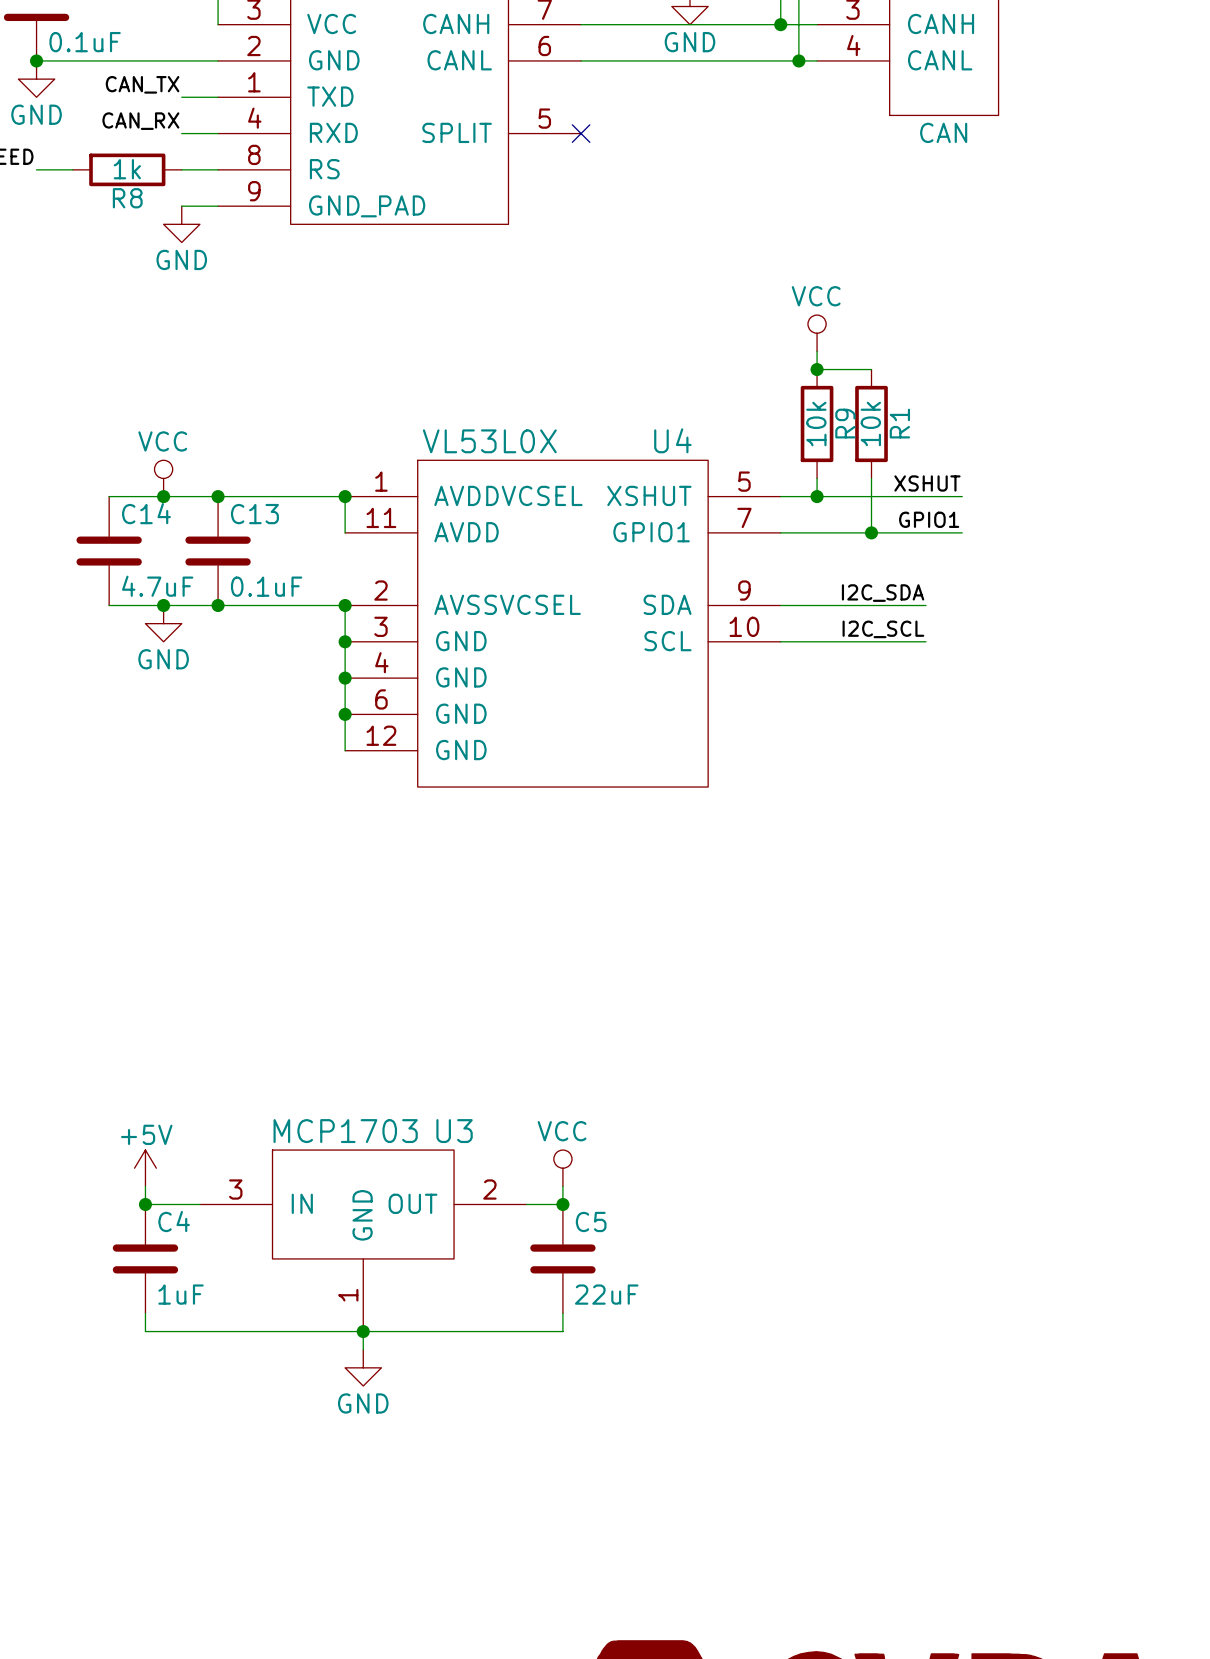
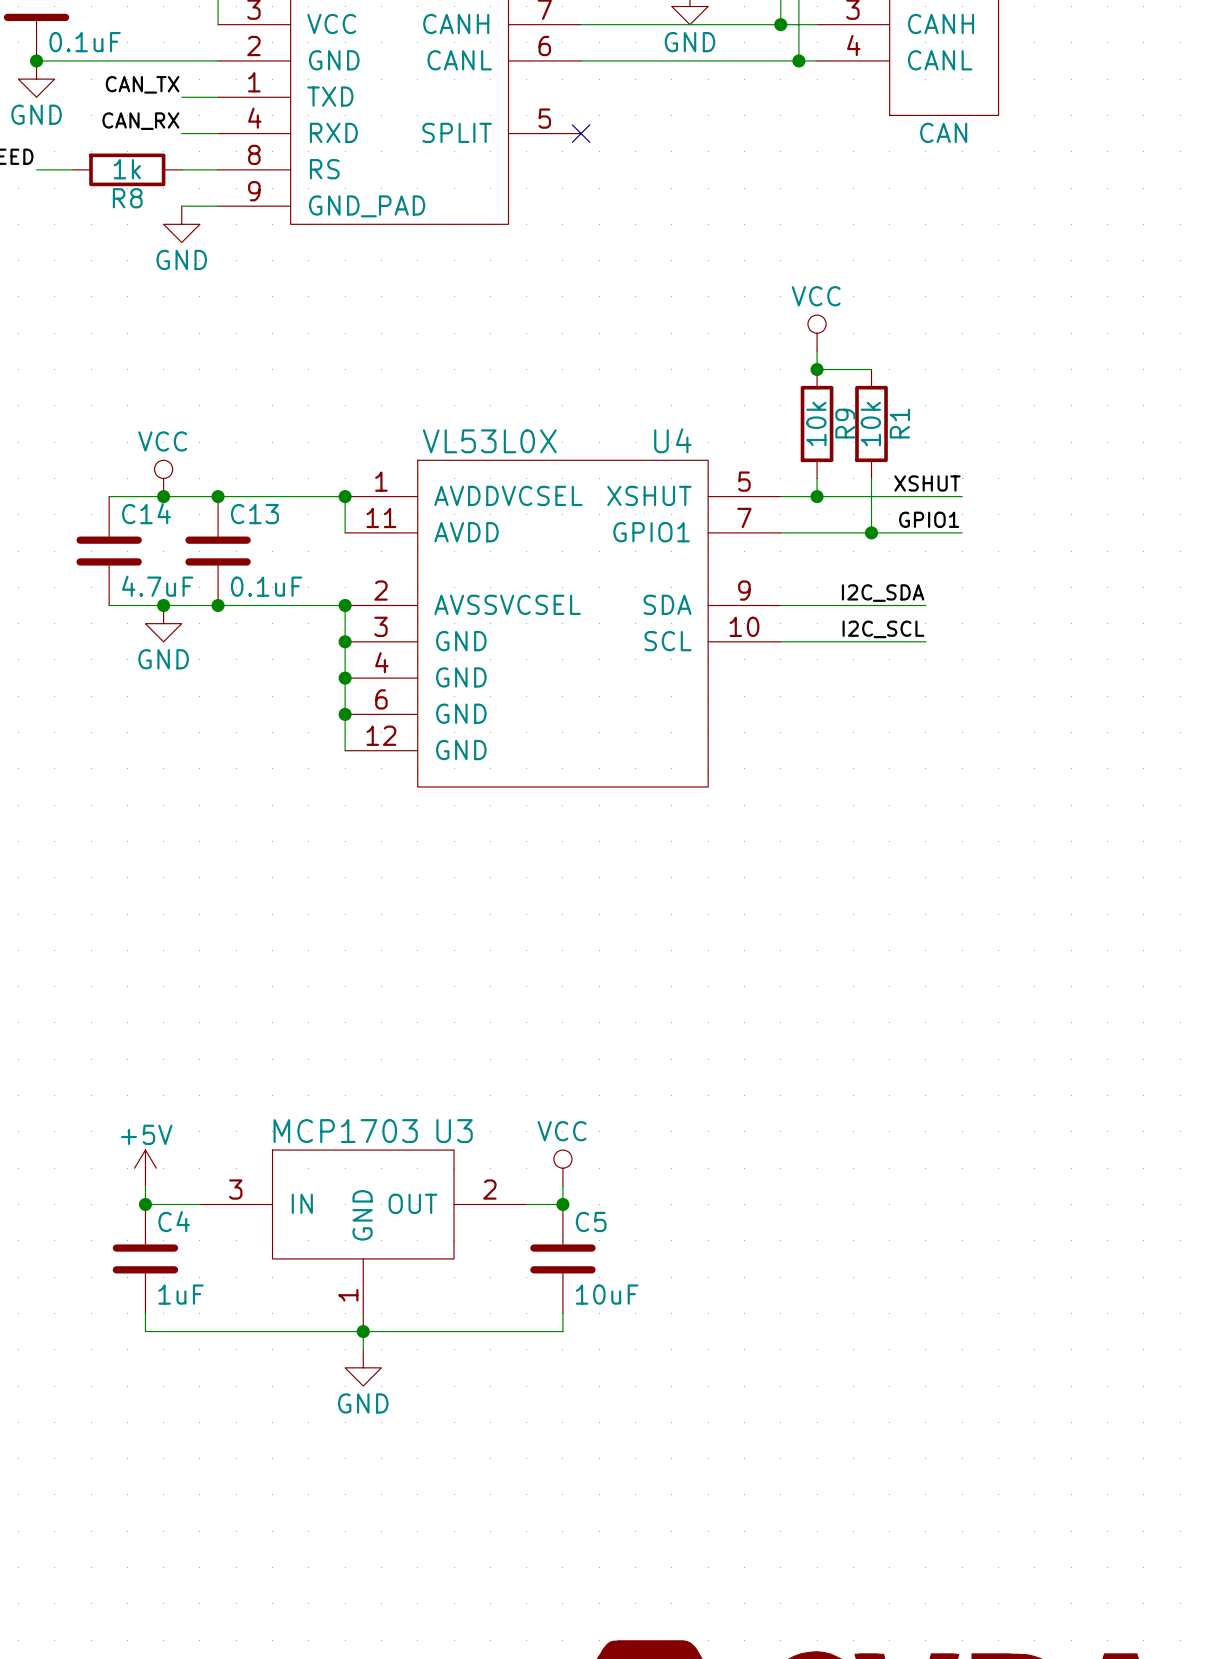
C5 value: 22uF (606, 1294) -> 10uF (607, 1294)

